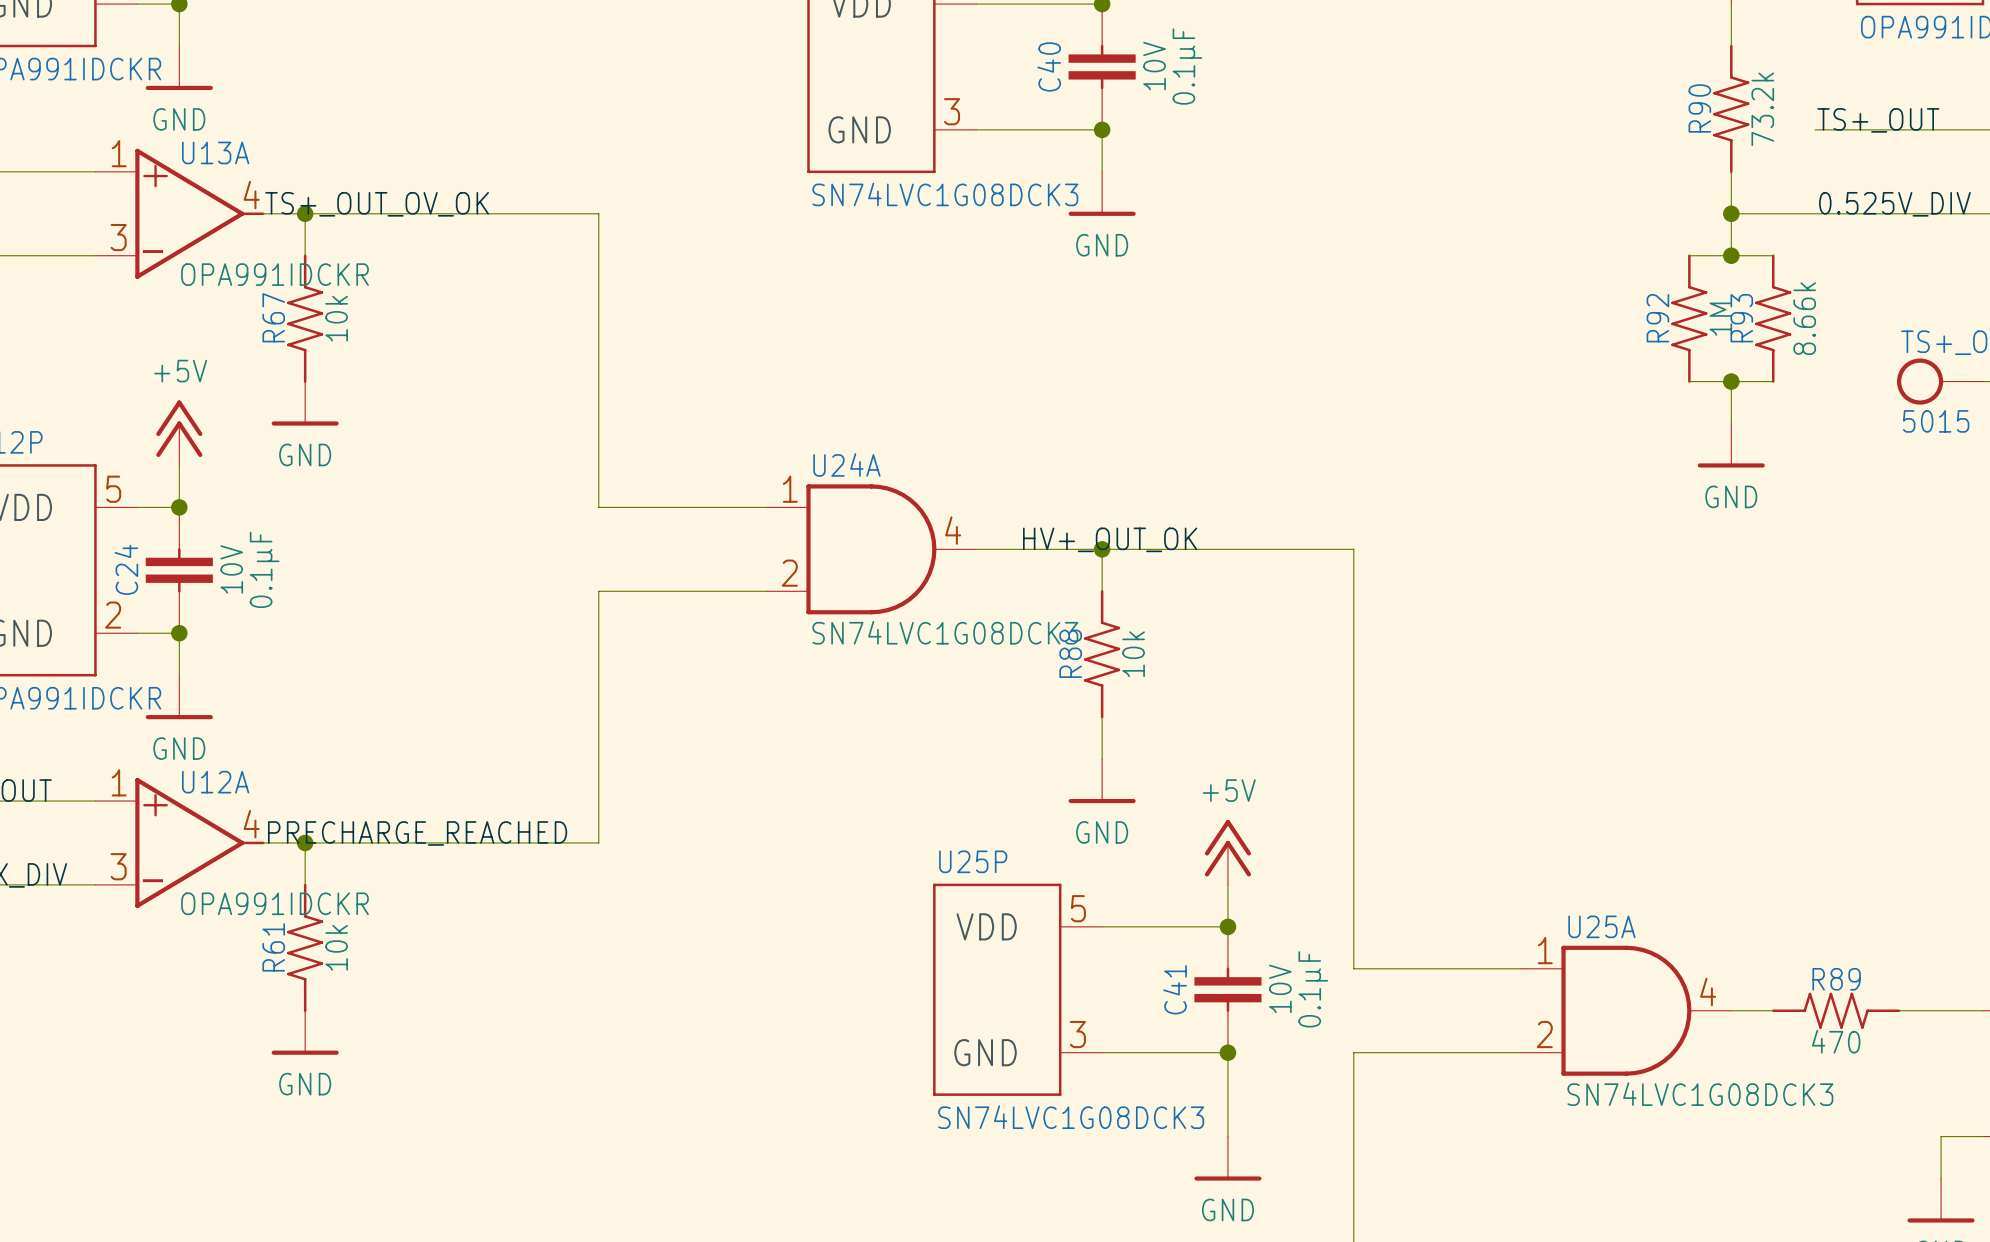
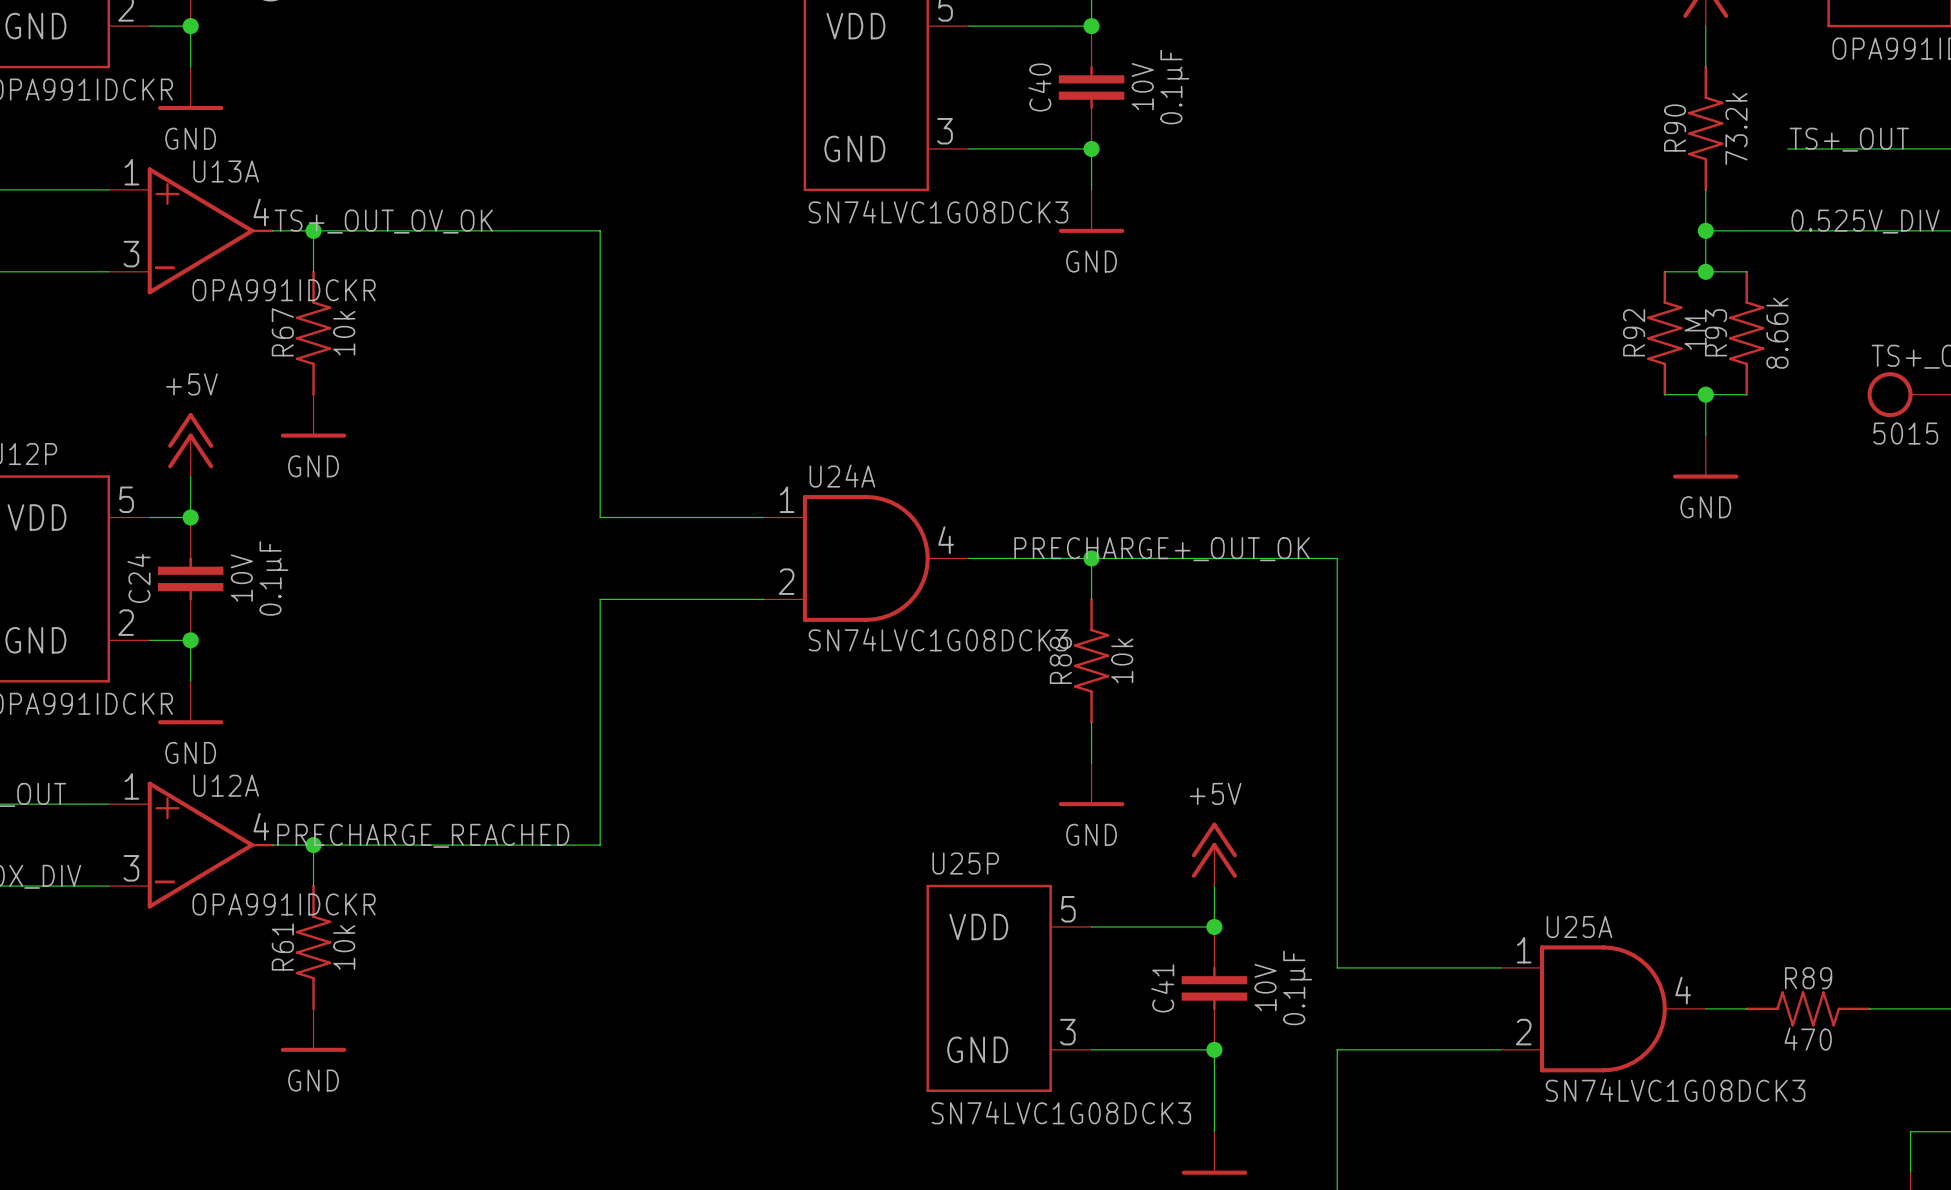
label: HV+_OUT_OK (1110, 539) -> PRECHARGE+_OUT_OK (1162, 549)

